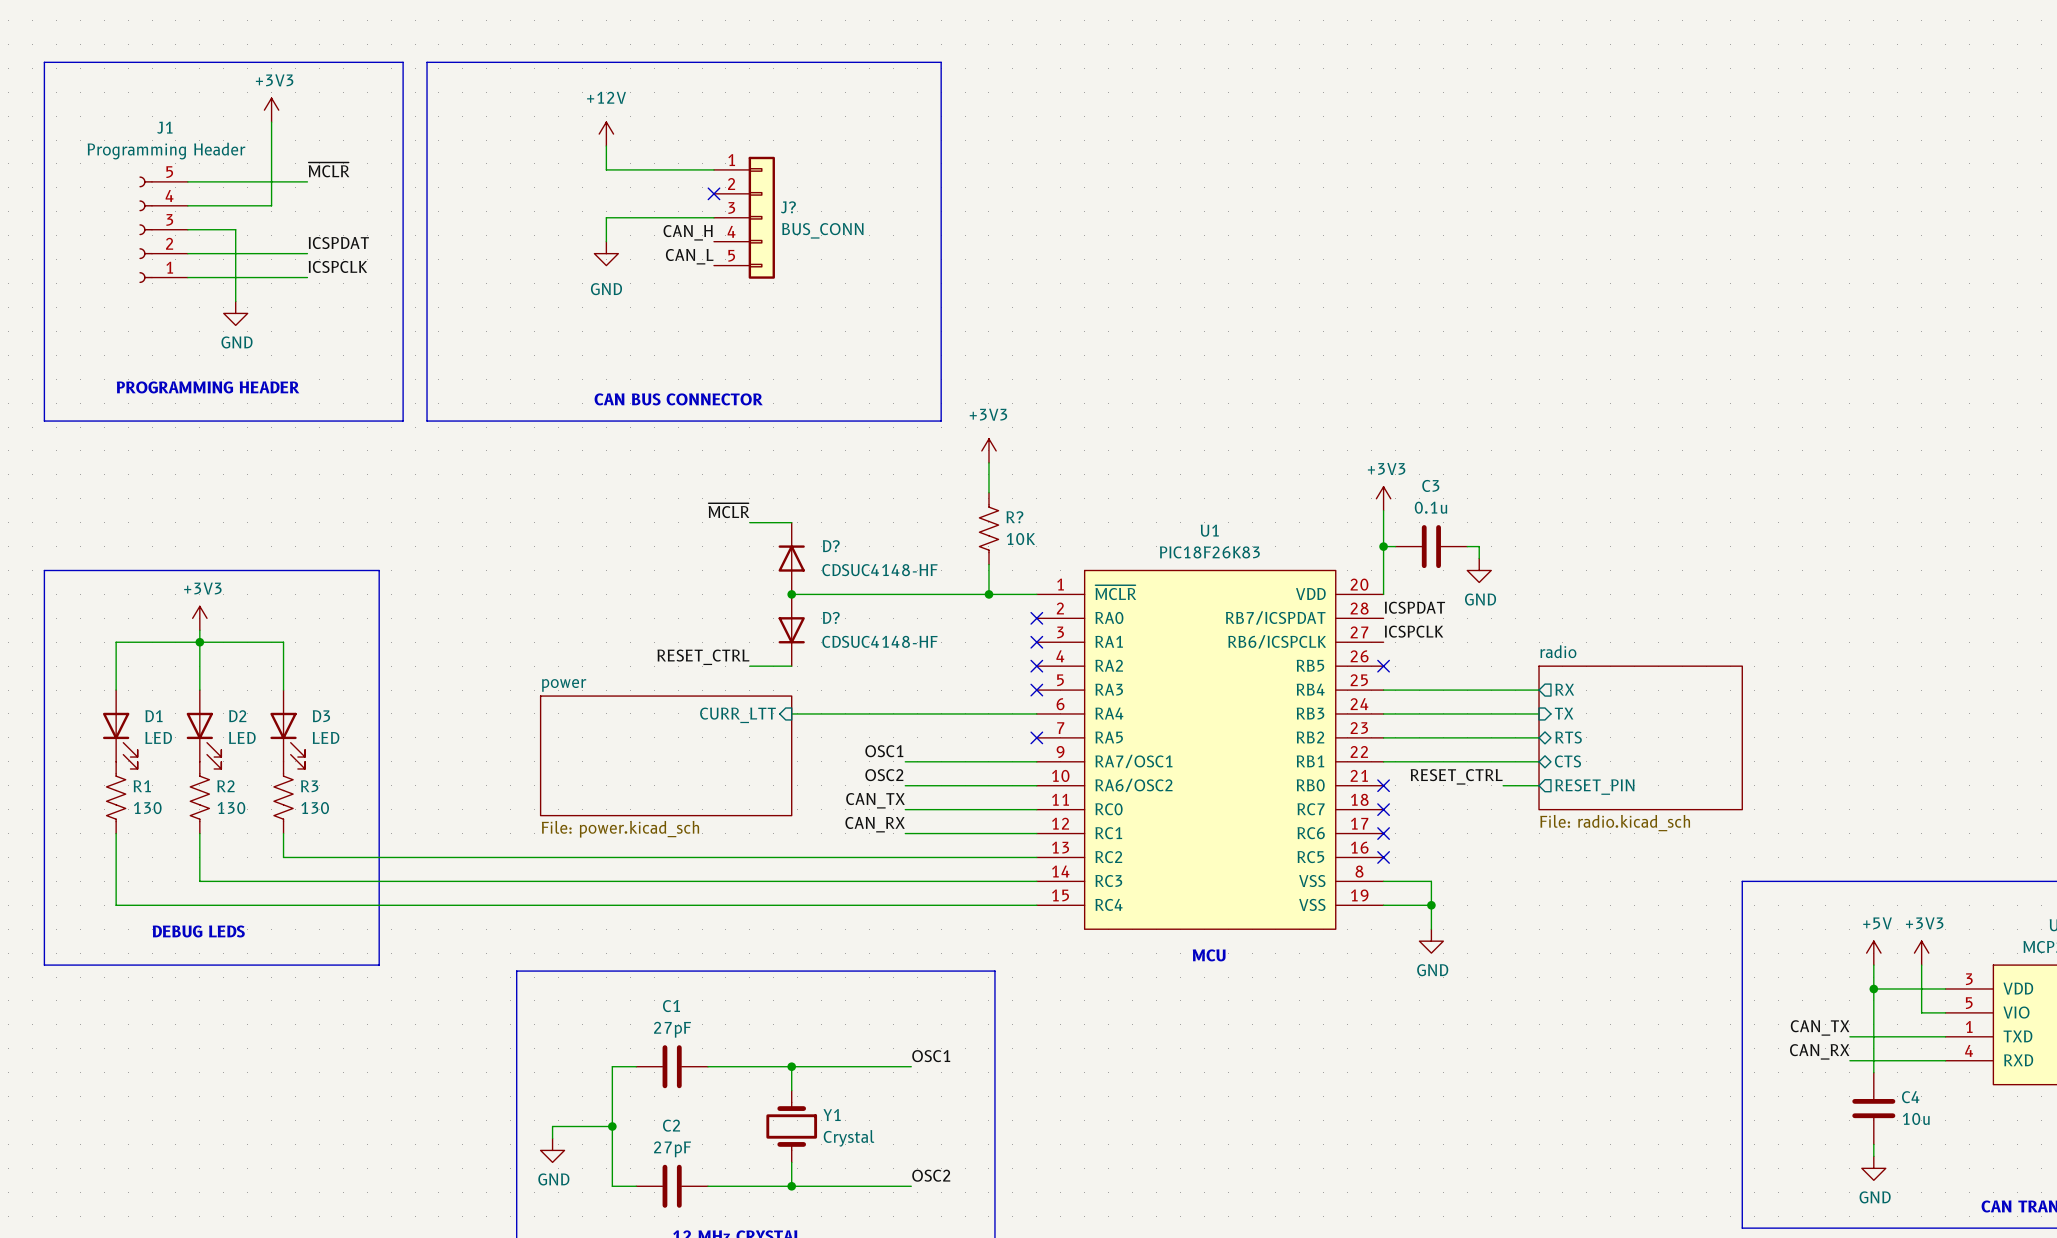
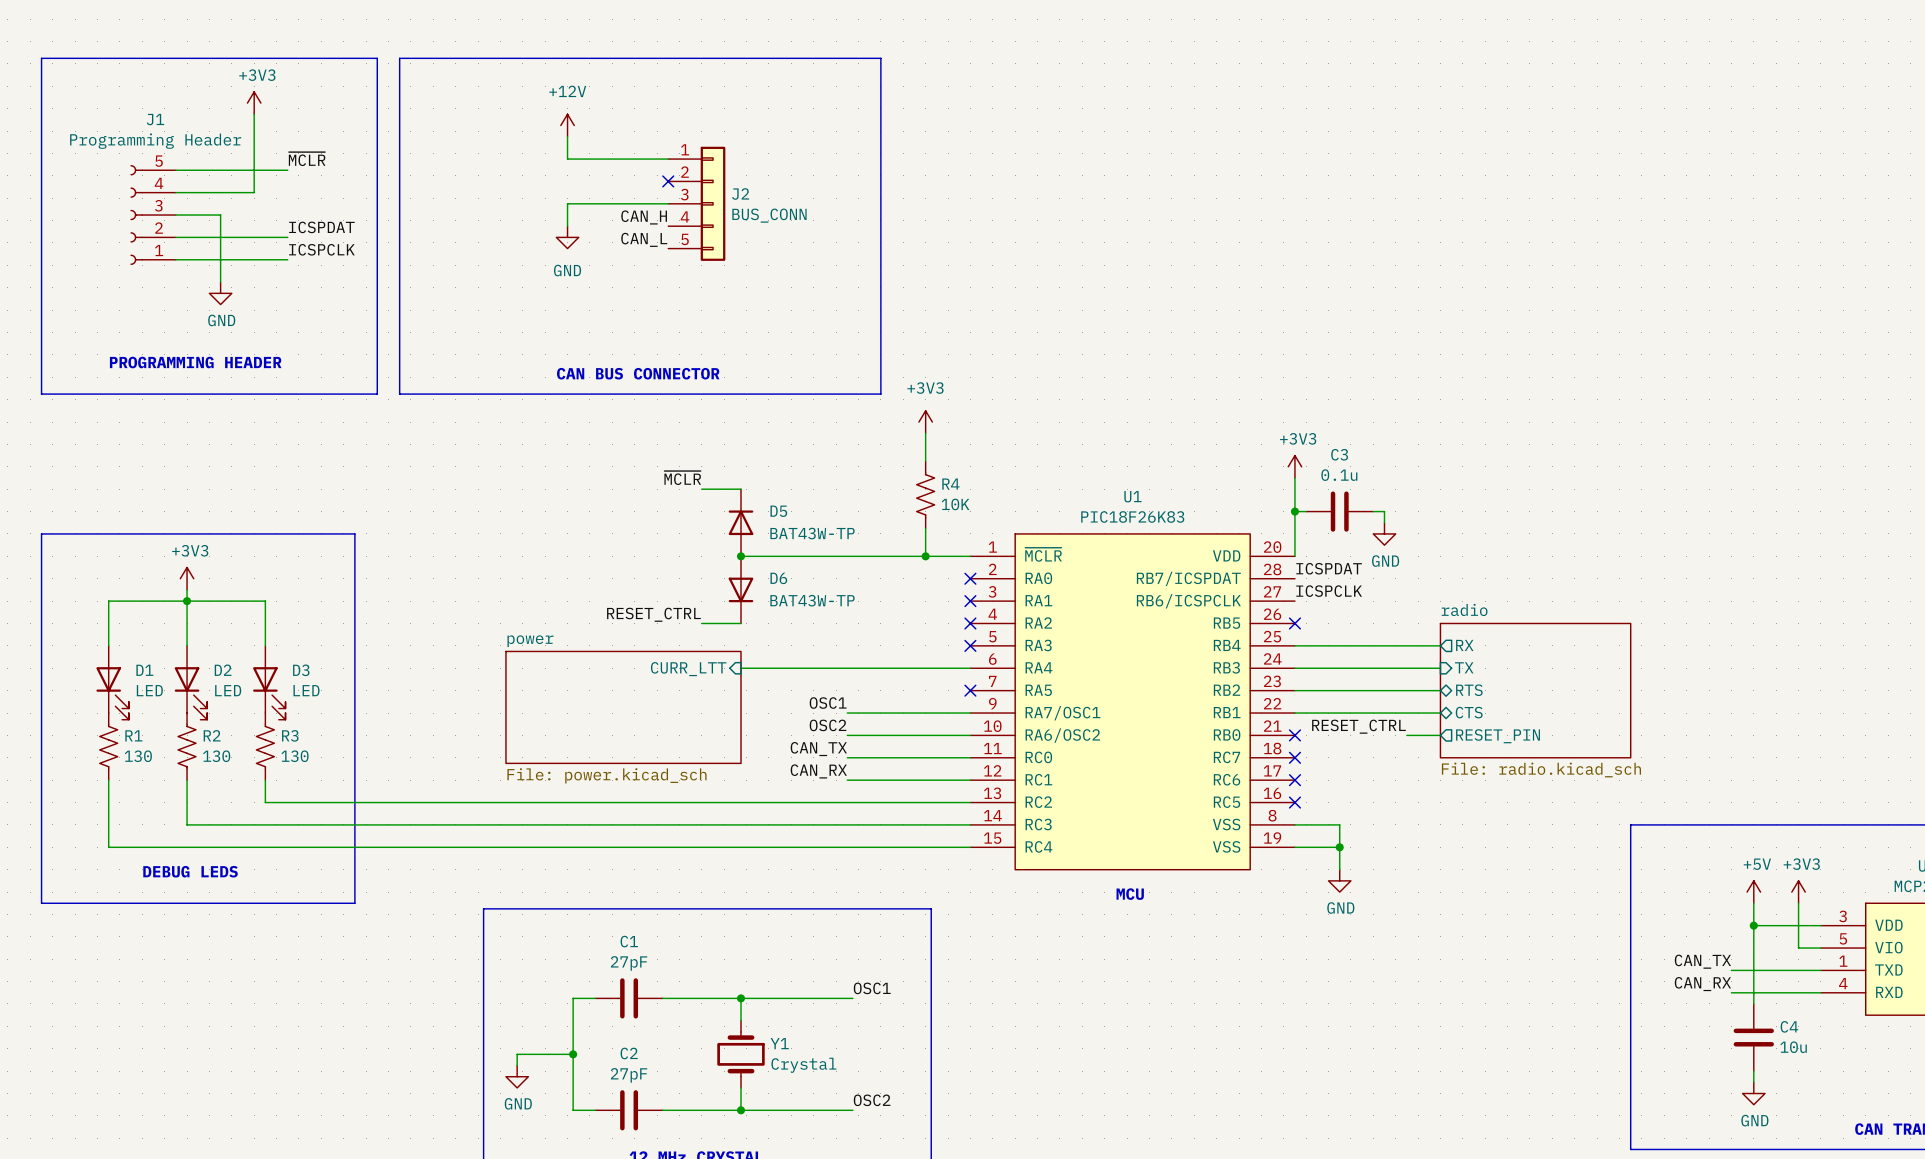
J? name: J? (788, 207) -> J2 (740, 194)
R? name: R? (1014, 517) -> R4 (950, 484)
D? name: D? (831, 546) -> D5 (778, 511)
D? value: CDSUC4148-HF (879, 570) -> BAT43W-TP (812, 533)
D? name: D? (831, 617) -> D6 (778, 578)
D? value: CDSUC4148-HF (879, 641) -> BAT43W-TP (812, 600)

